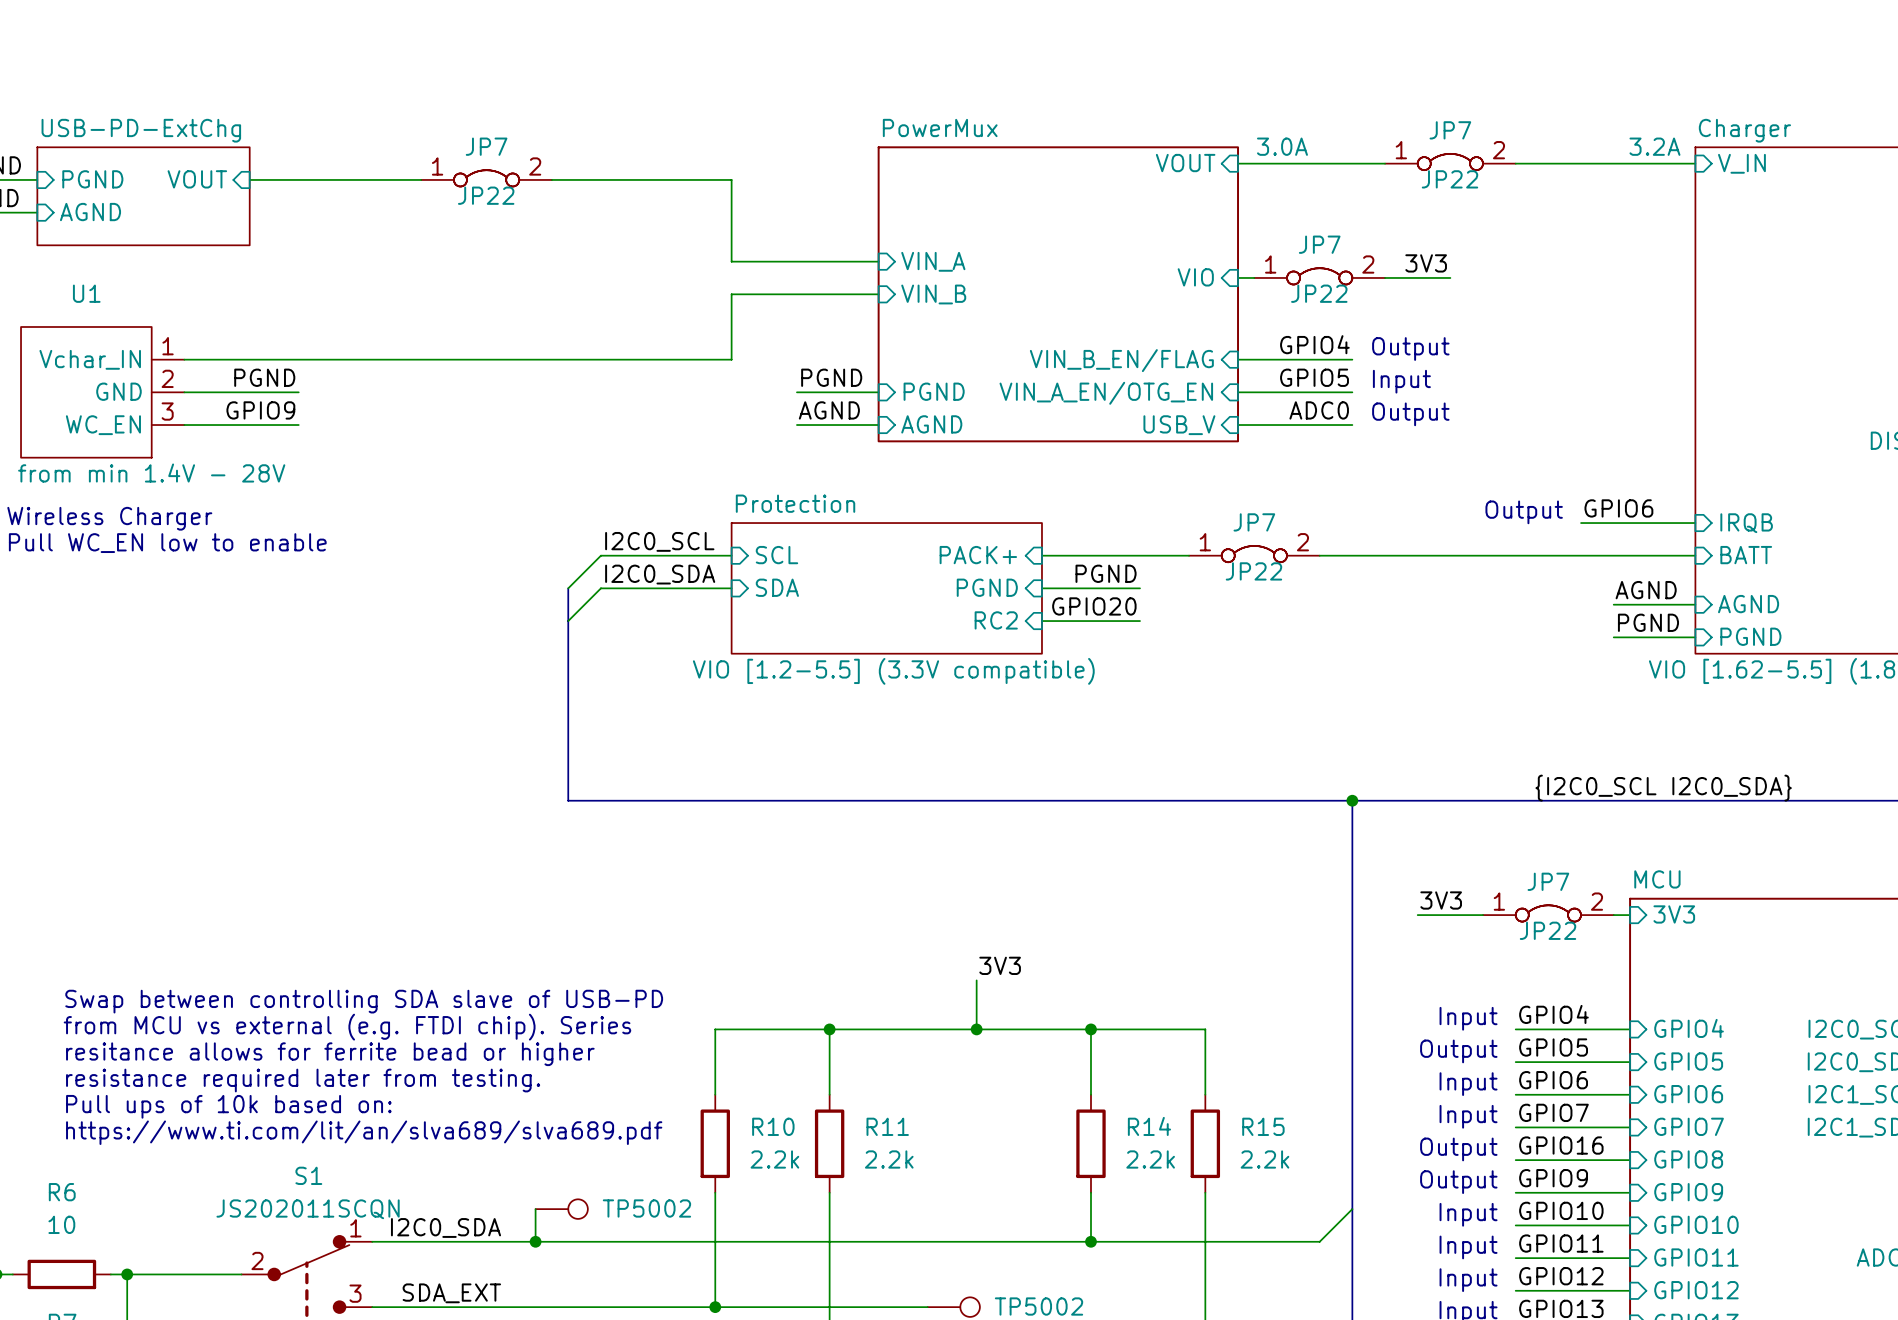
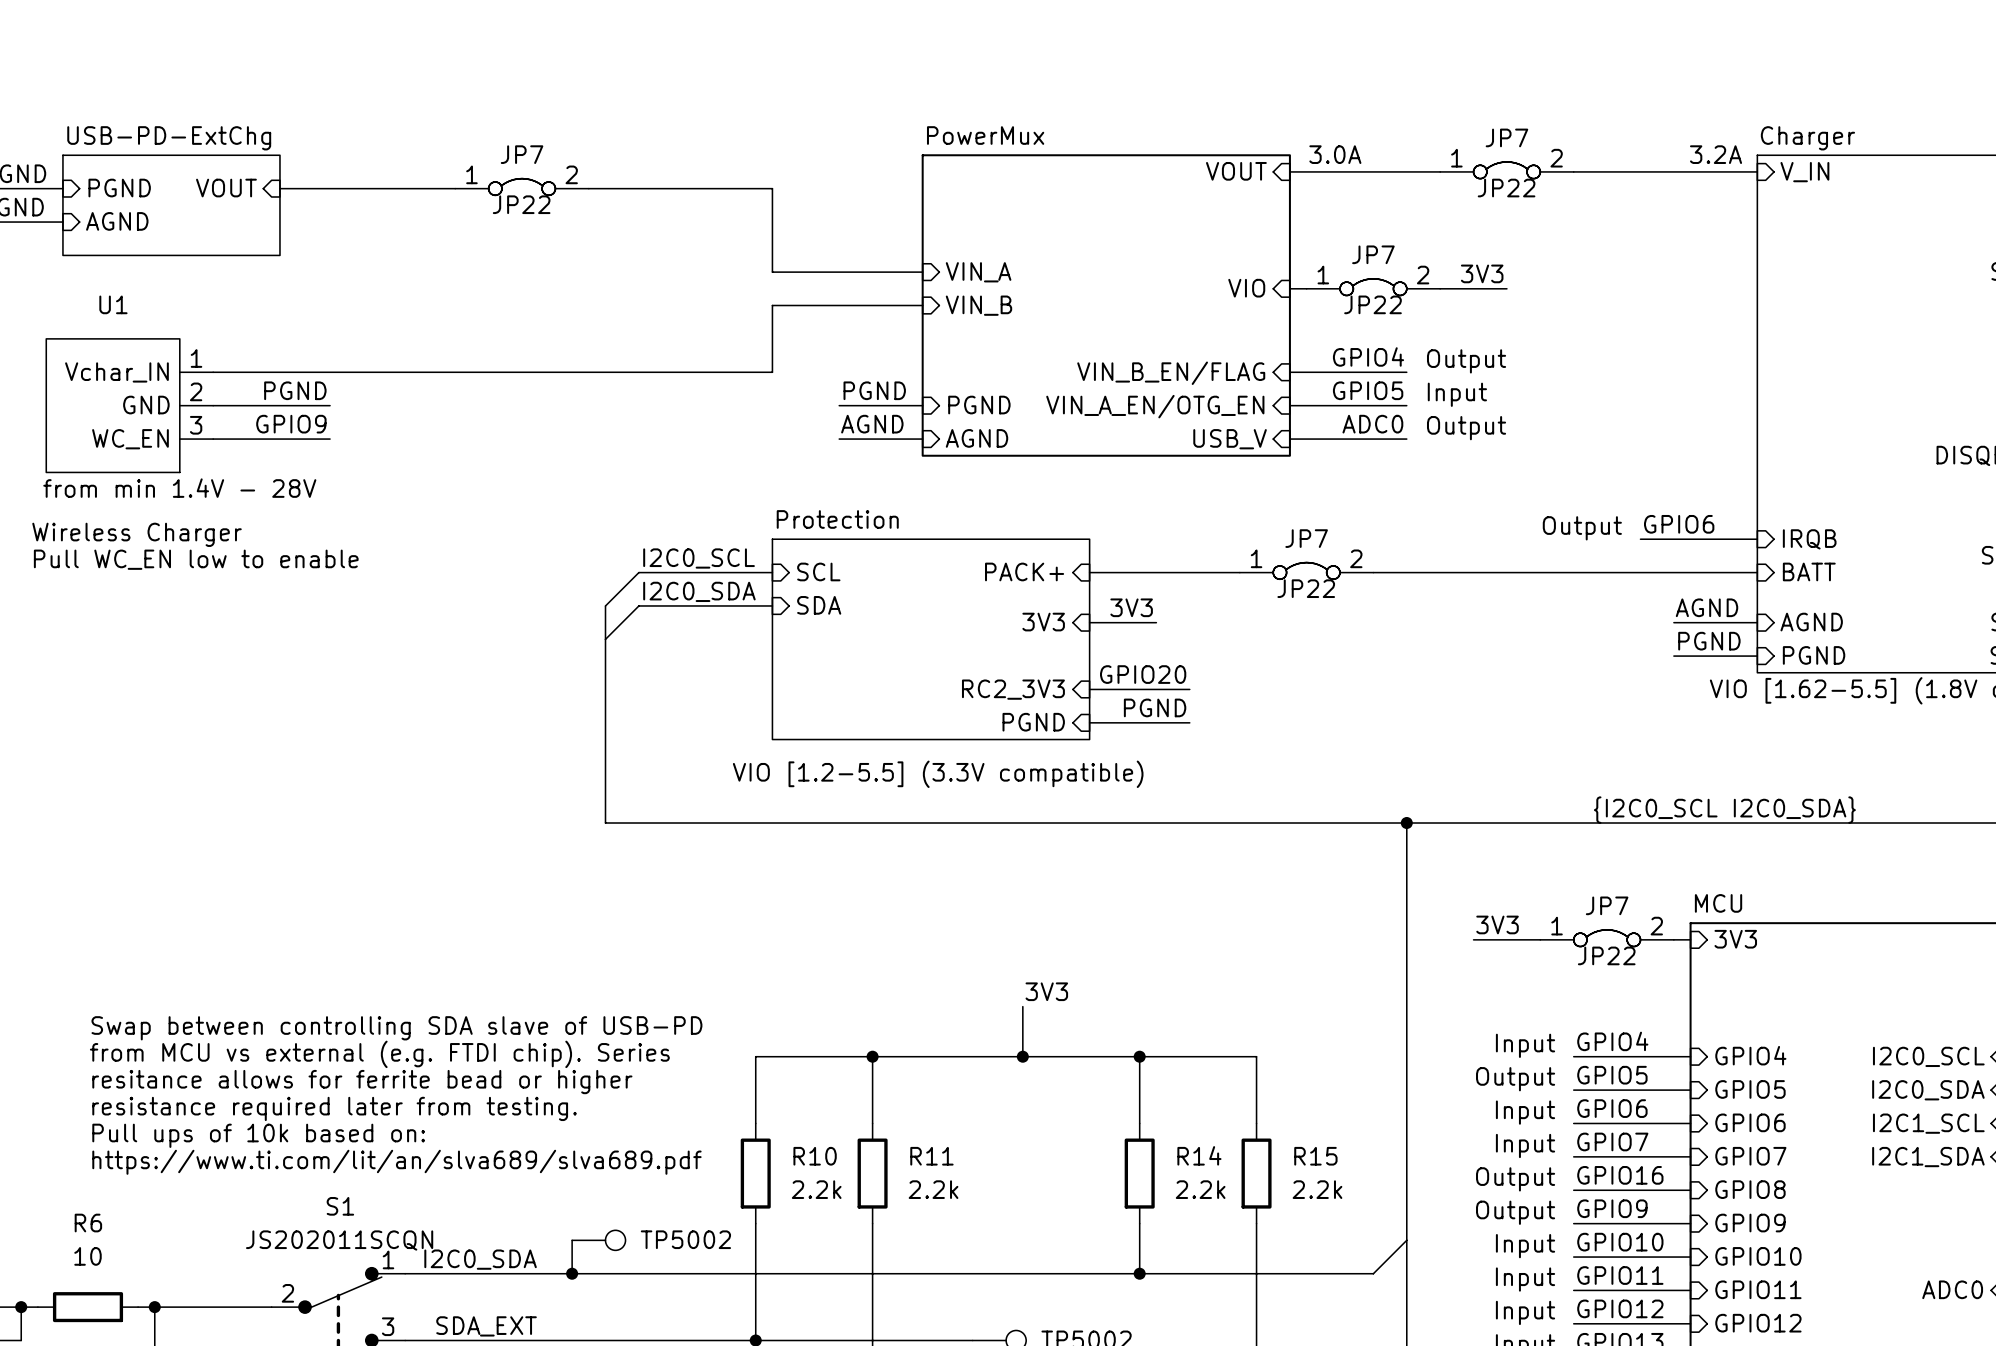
label position: PGND (1106, 573) -> PGND (1155, 707)
sheet pin position: PGND (987, 587) -> PGND (1033, 722)
sheet Protection: (886, 588) -> none
wire: (1041, 588) (1140, 588) -> (1089, 722) (1189, 722)
label: none -> 3V3 (1131, 607)
sheet pin: none -> 3V3 (1043, 622)
wire: none -> (1089, 622) (1156, 622)
label position: GPIO20 (1094, 606) -> GPIO20 (1143, 674)
sheet pin: RC2 (996, 620) -> none
sheet Protection: none -> (931, 639)
wire: (1041, 621) (1140, 621) -> (1089, 689) (1189, 689)
sheet pin: none -> RC2_3V3 (1013, 689)

